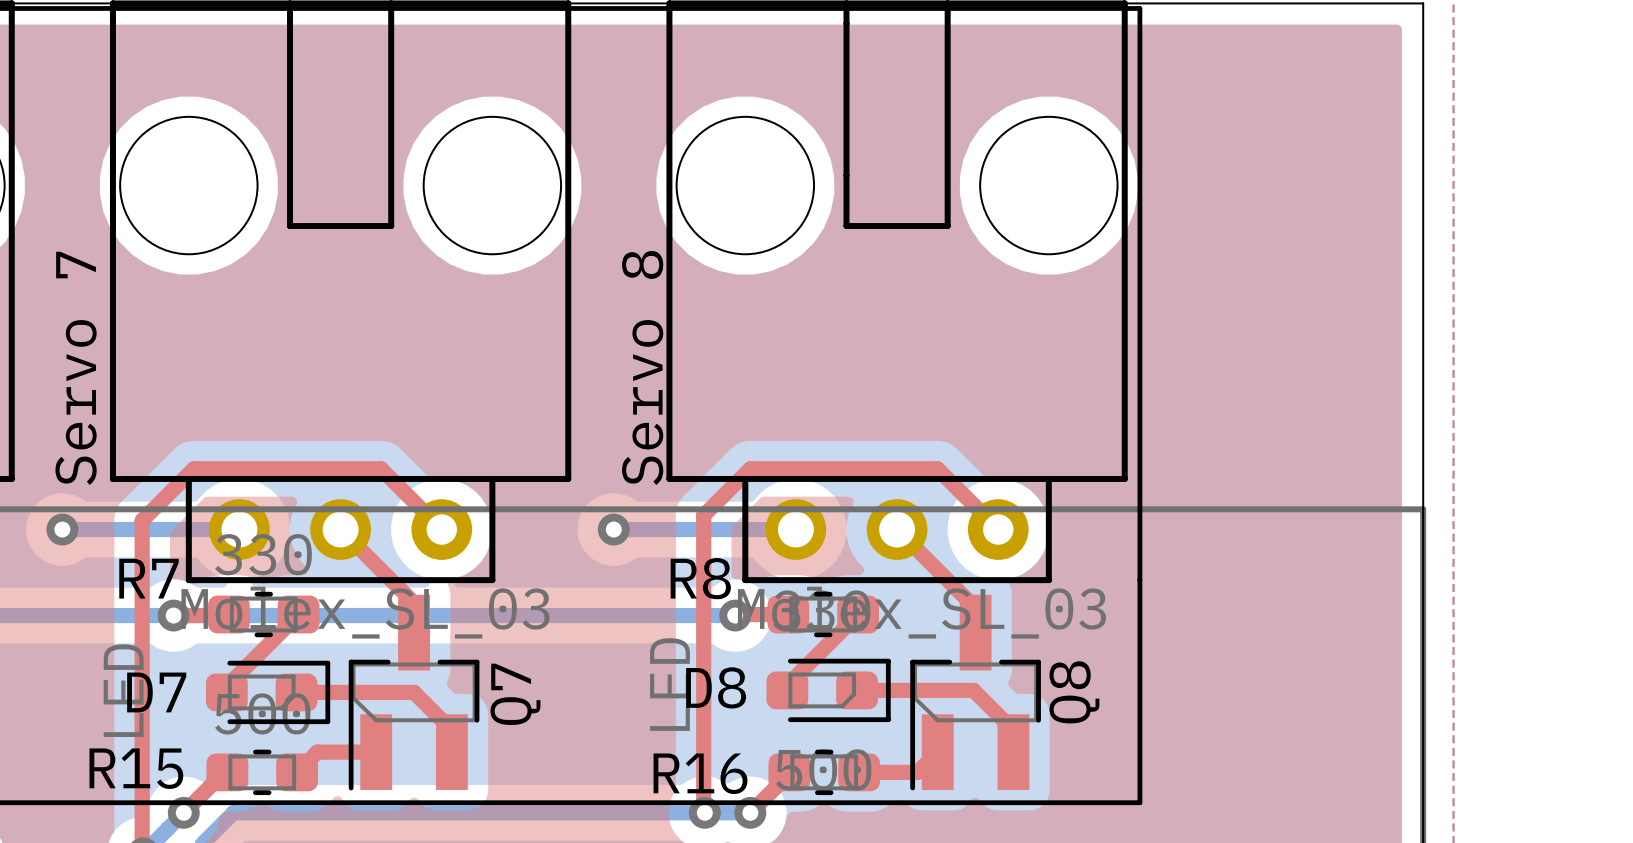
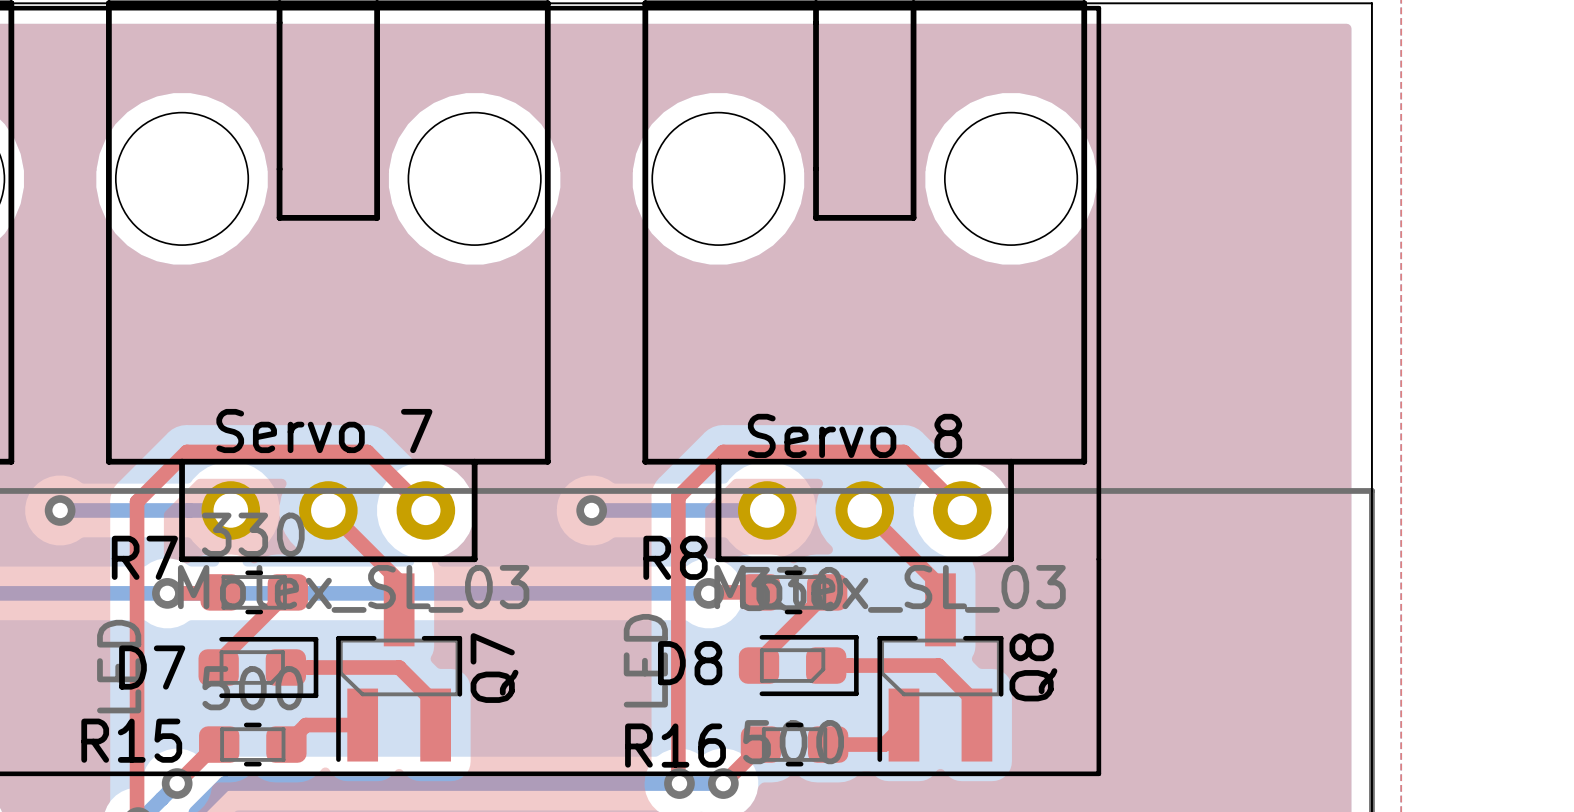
text rotation: 0° (642, 367) -> 90° clockwise (855, 435)
text rotation: 0° (76, 368) -> 90° clockwise (324, 431)

